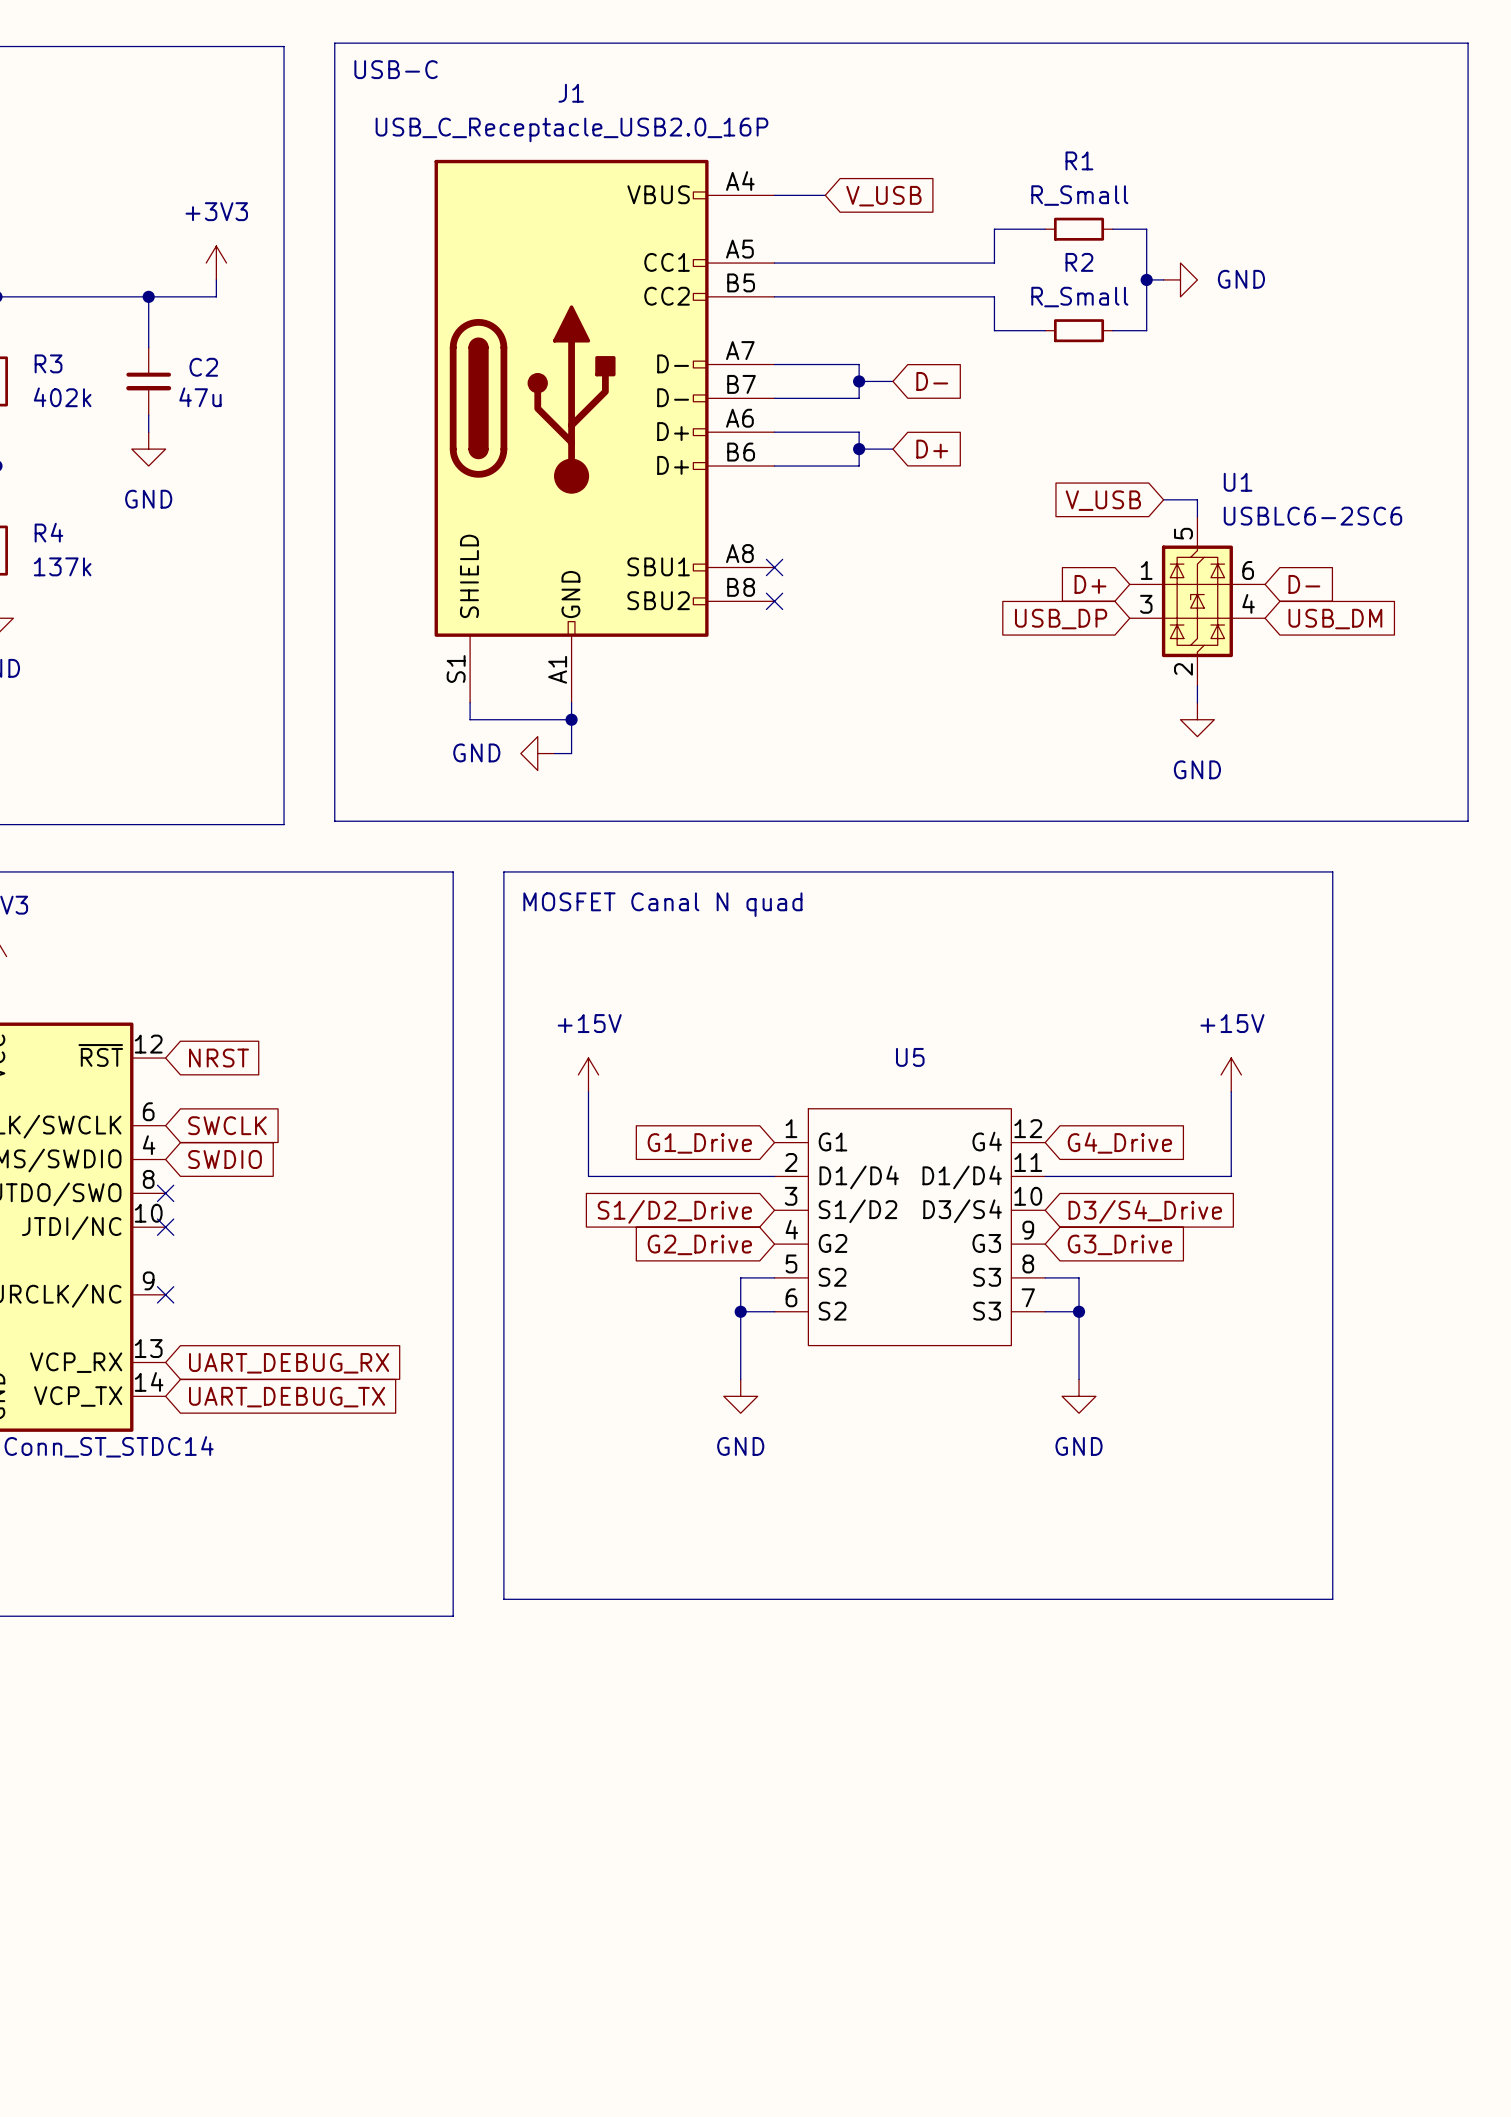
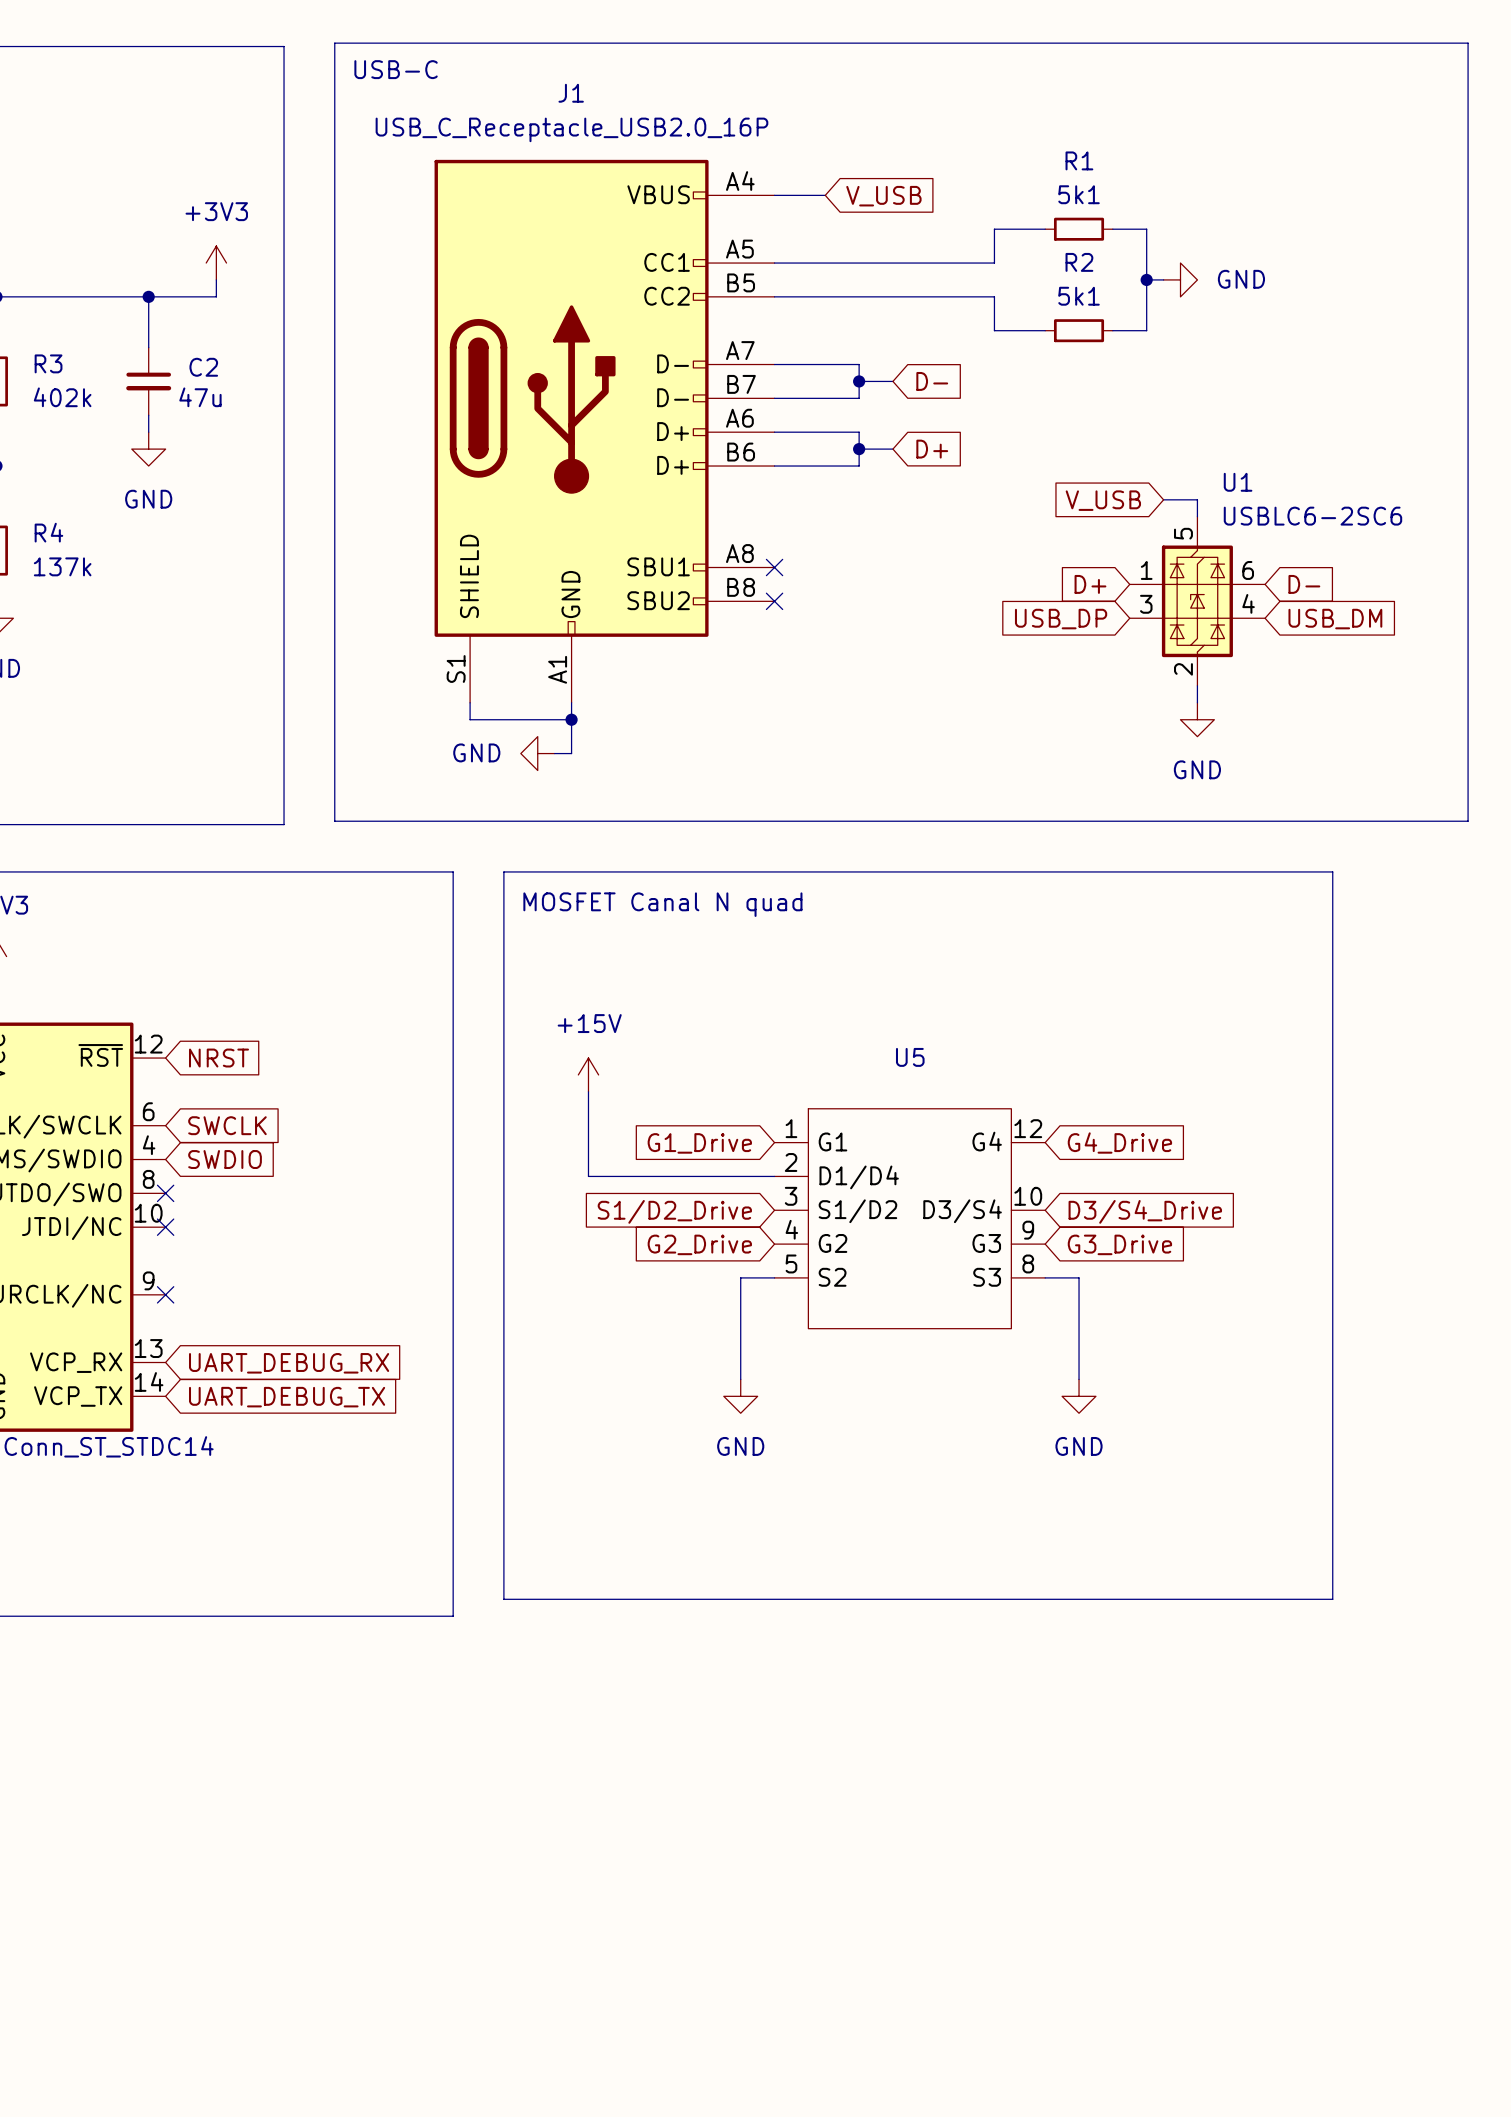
R1 value: R_Small (1079, 195) -> 5k1 (1079, 194)
R2 value: R_Small (1079, 297) -> 5k1 (1079, 296)
power symbol: +15V (1231, 1074) -> none
wire: (1231, 1091) (1231, 1176) (1045, 1176) -> none
U5 symbol: [774, 1108, 1046, 1346] -> [774, 1108, 1046, 1329]
wire: (740, 1311) (774, 1311) -> none
junction: (740, 1311) -> none
wire: (1045, 1311) (1079, 1311) -> none
junction: (1079, 1311) -> none

